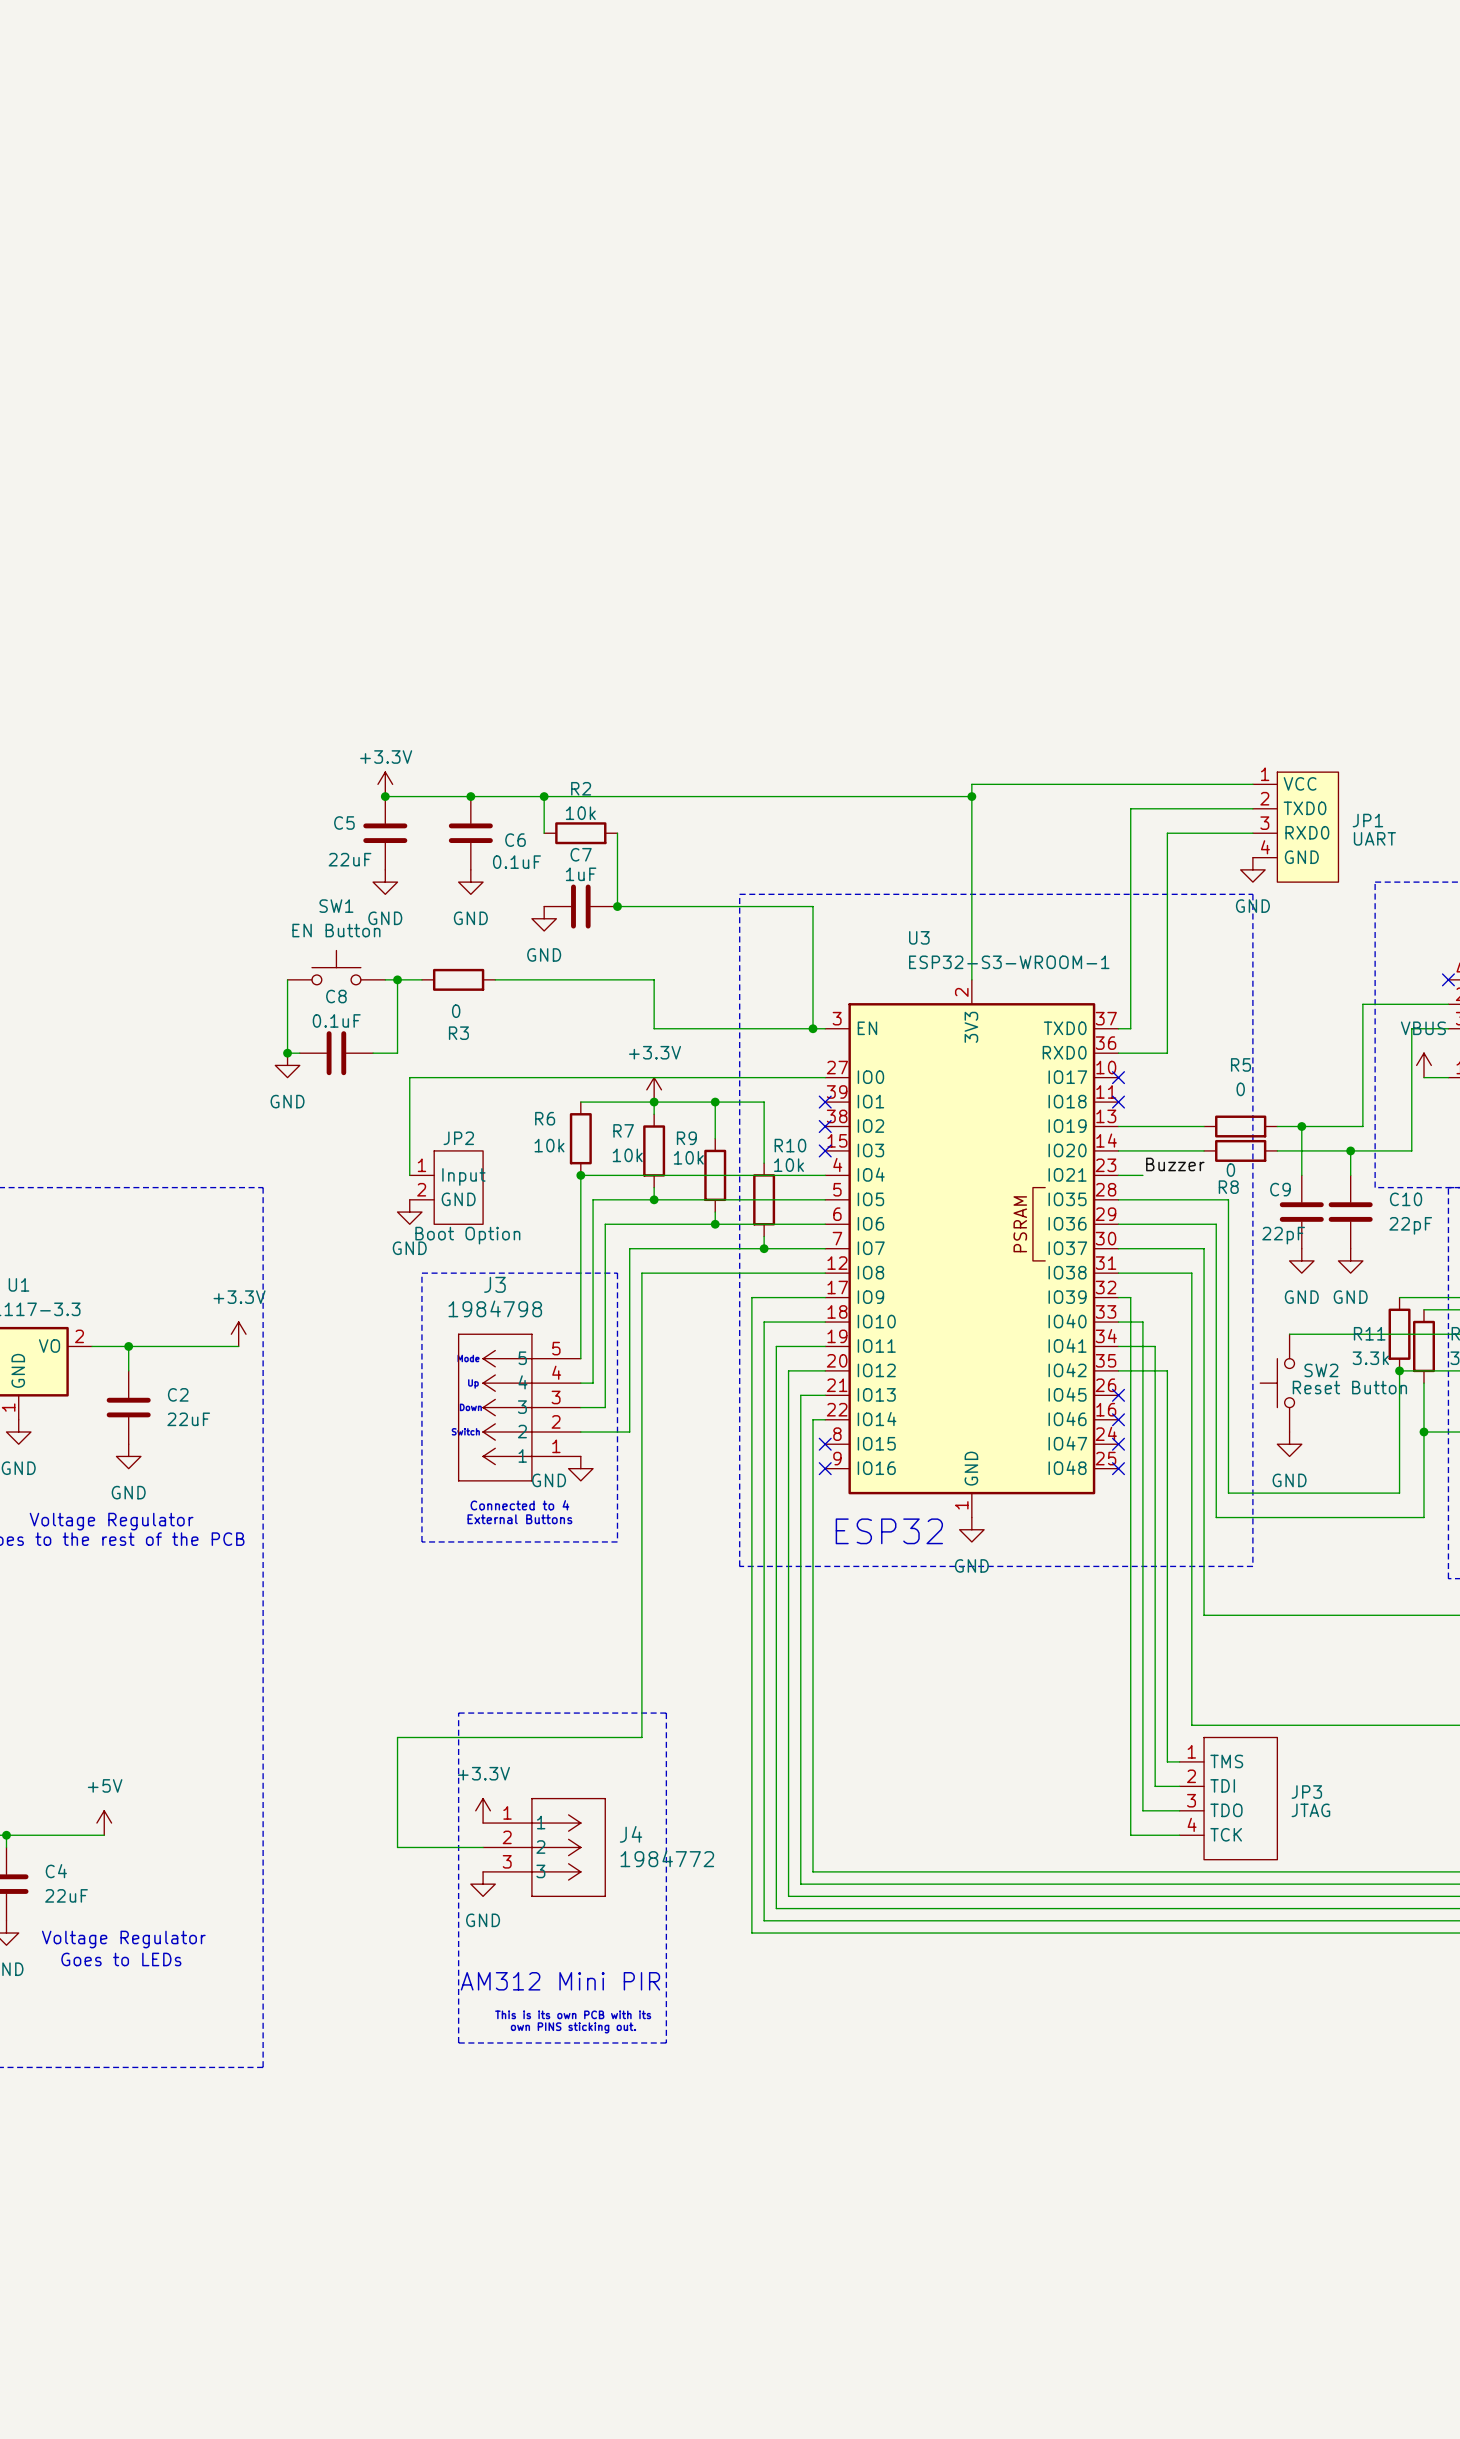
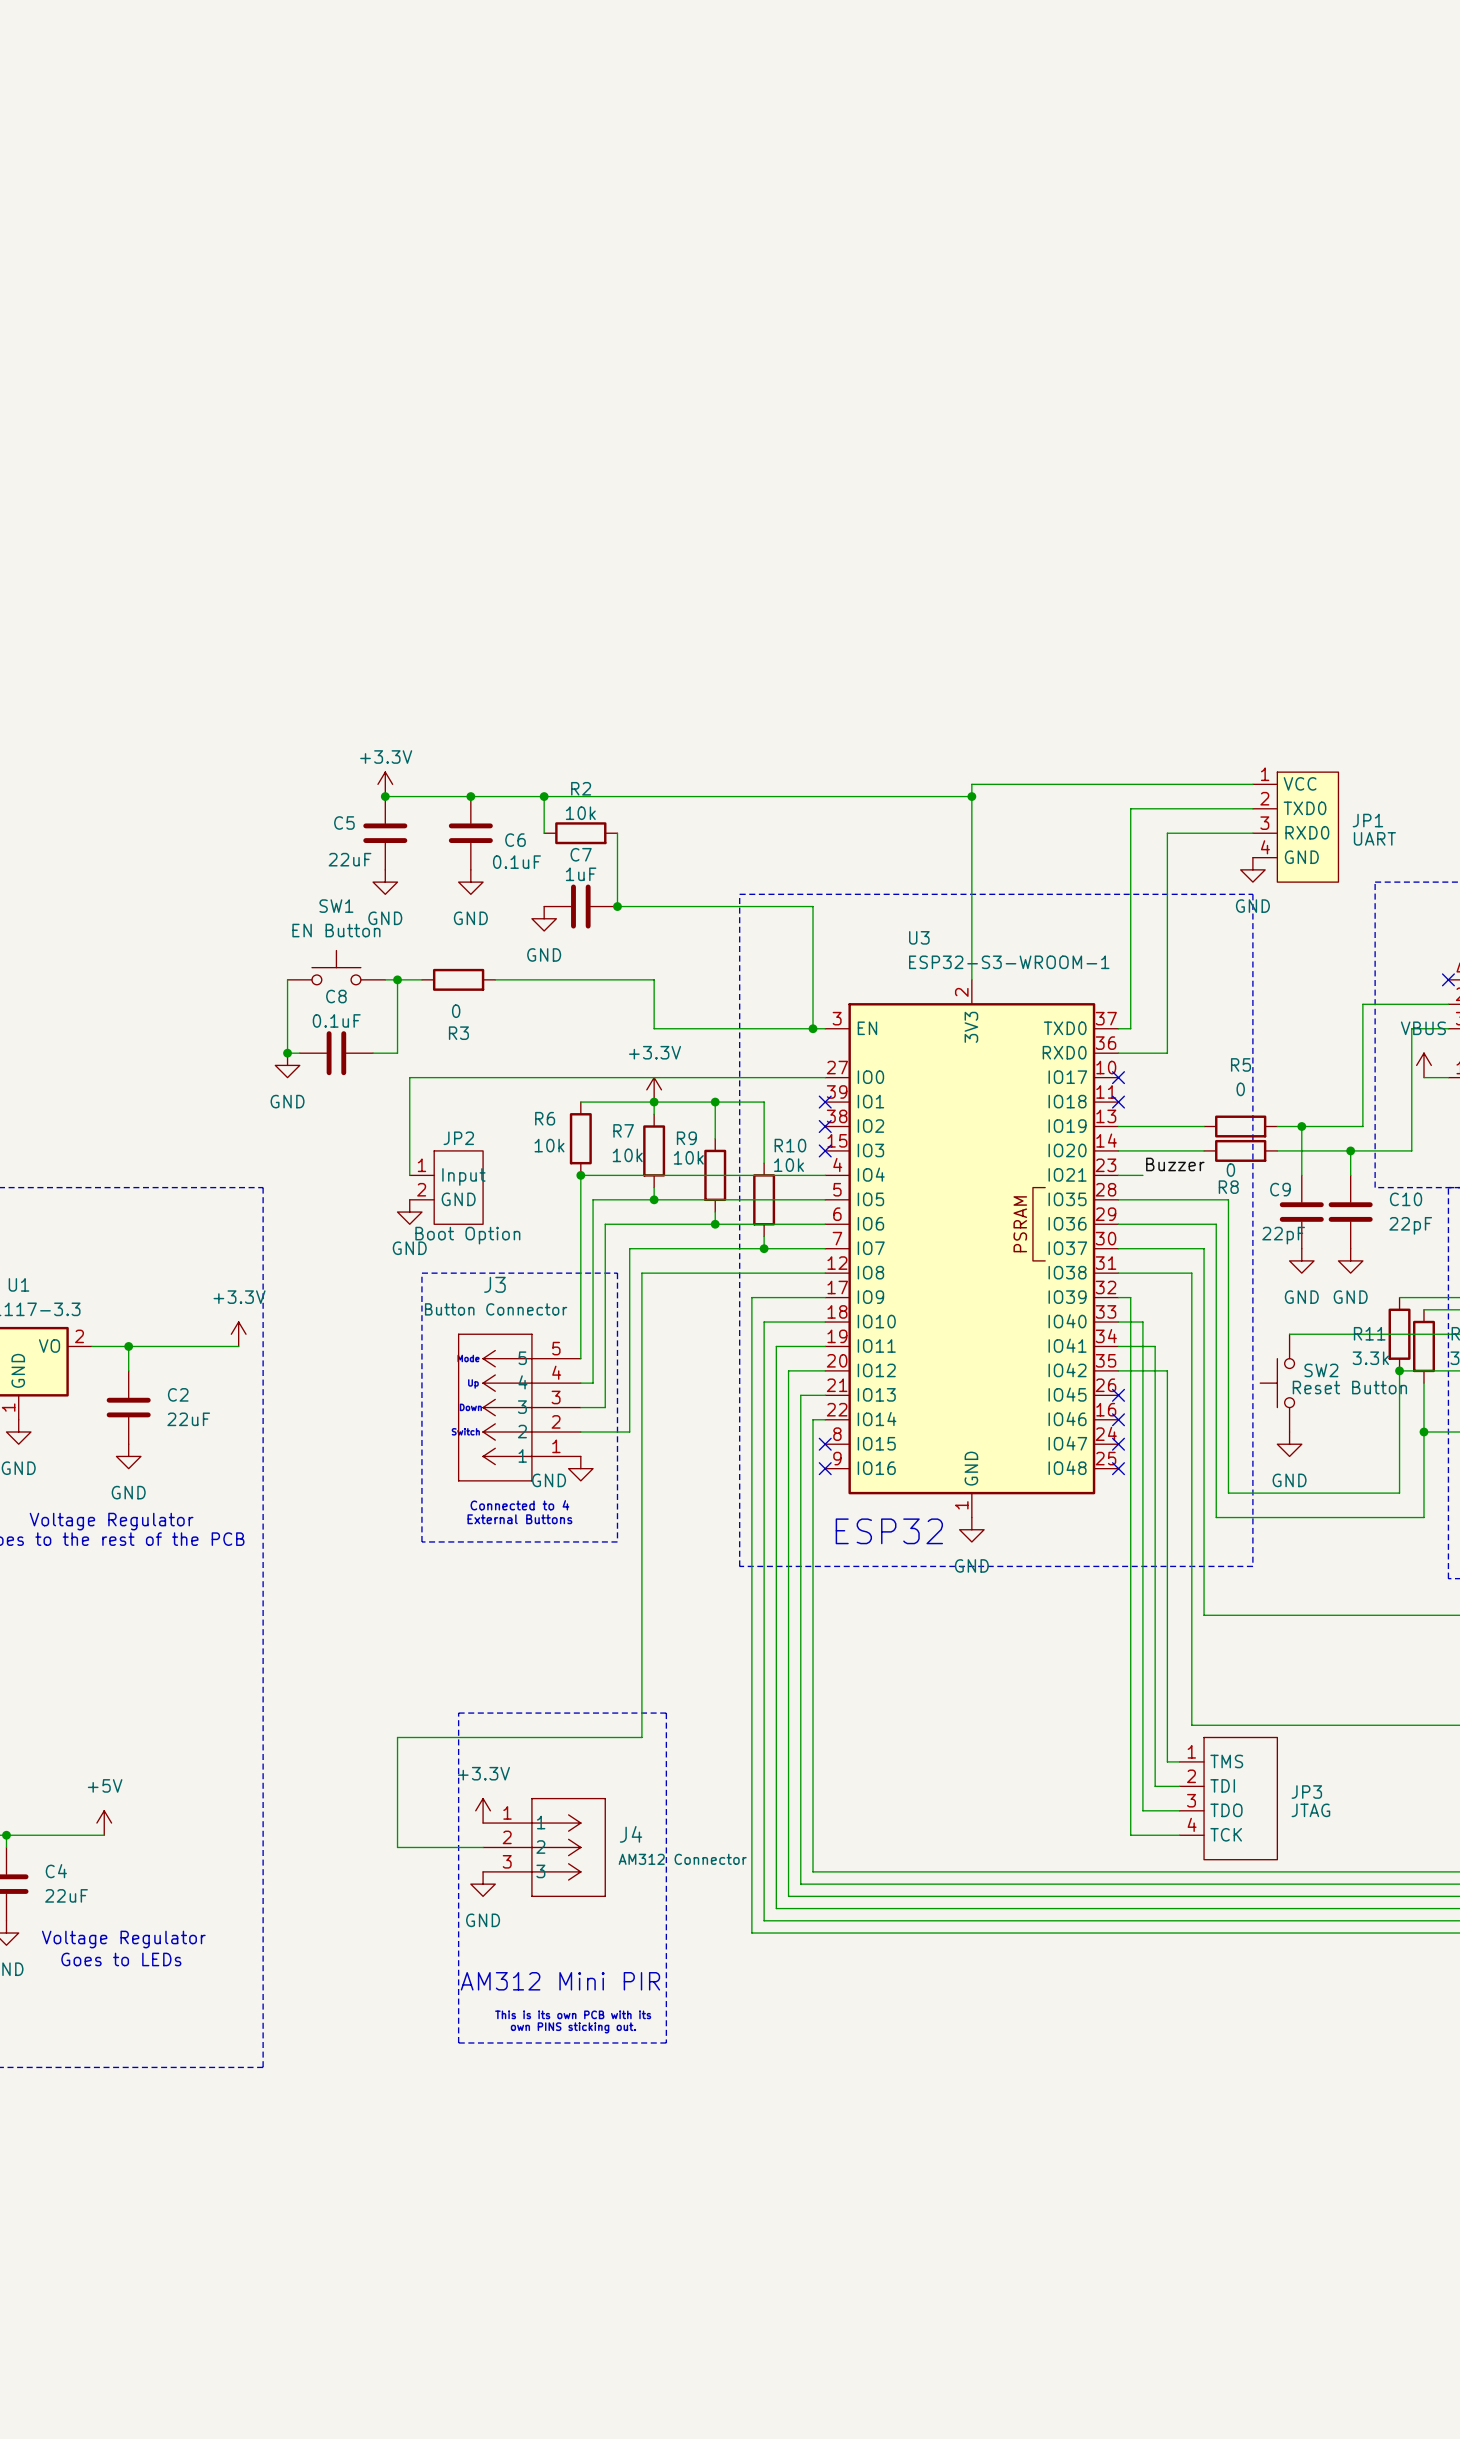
J3 value: 1984798 (495, 1308) -> Button Connector (496, 1309)
J4 value: 1984772 (667, 1858) -> AM312 Connector (682, 1859)

